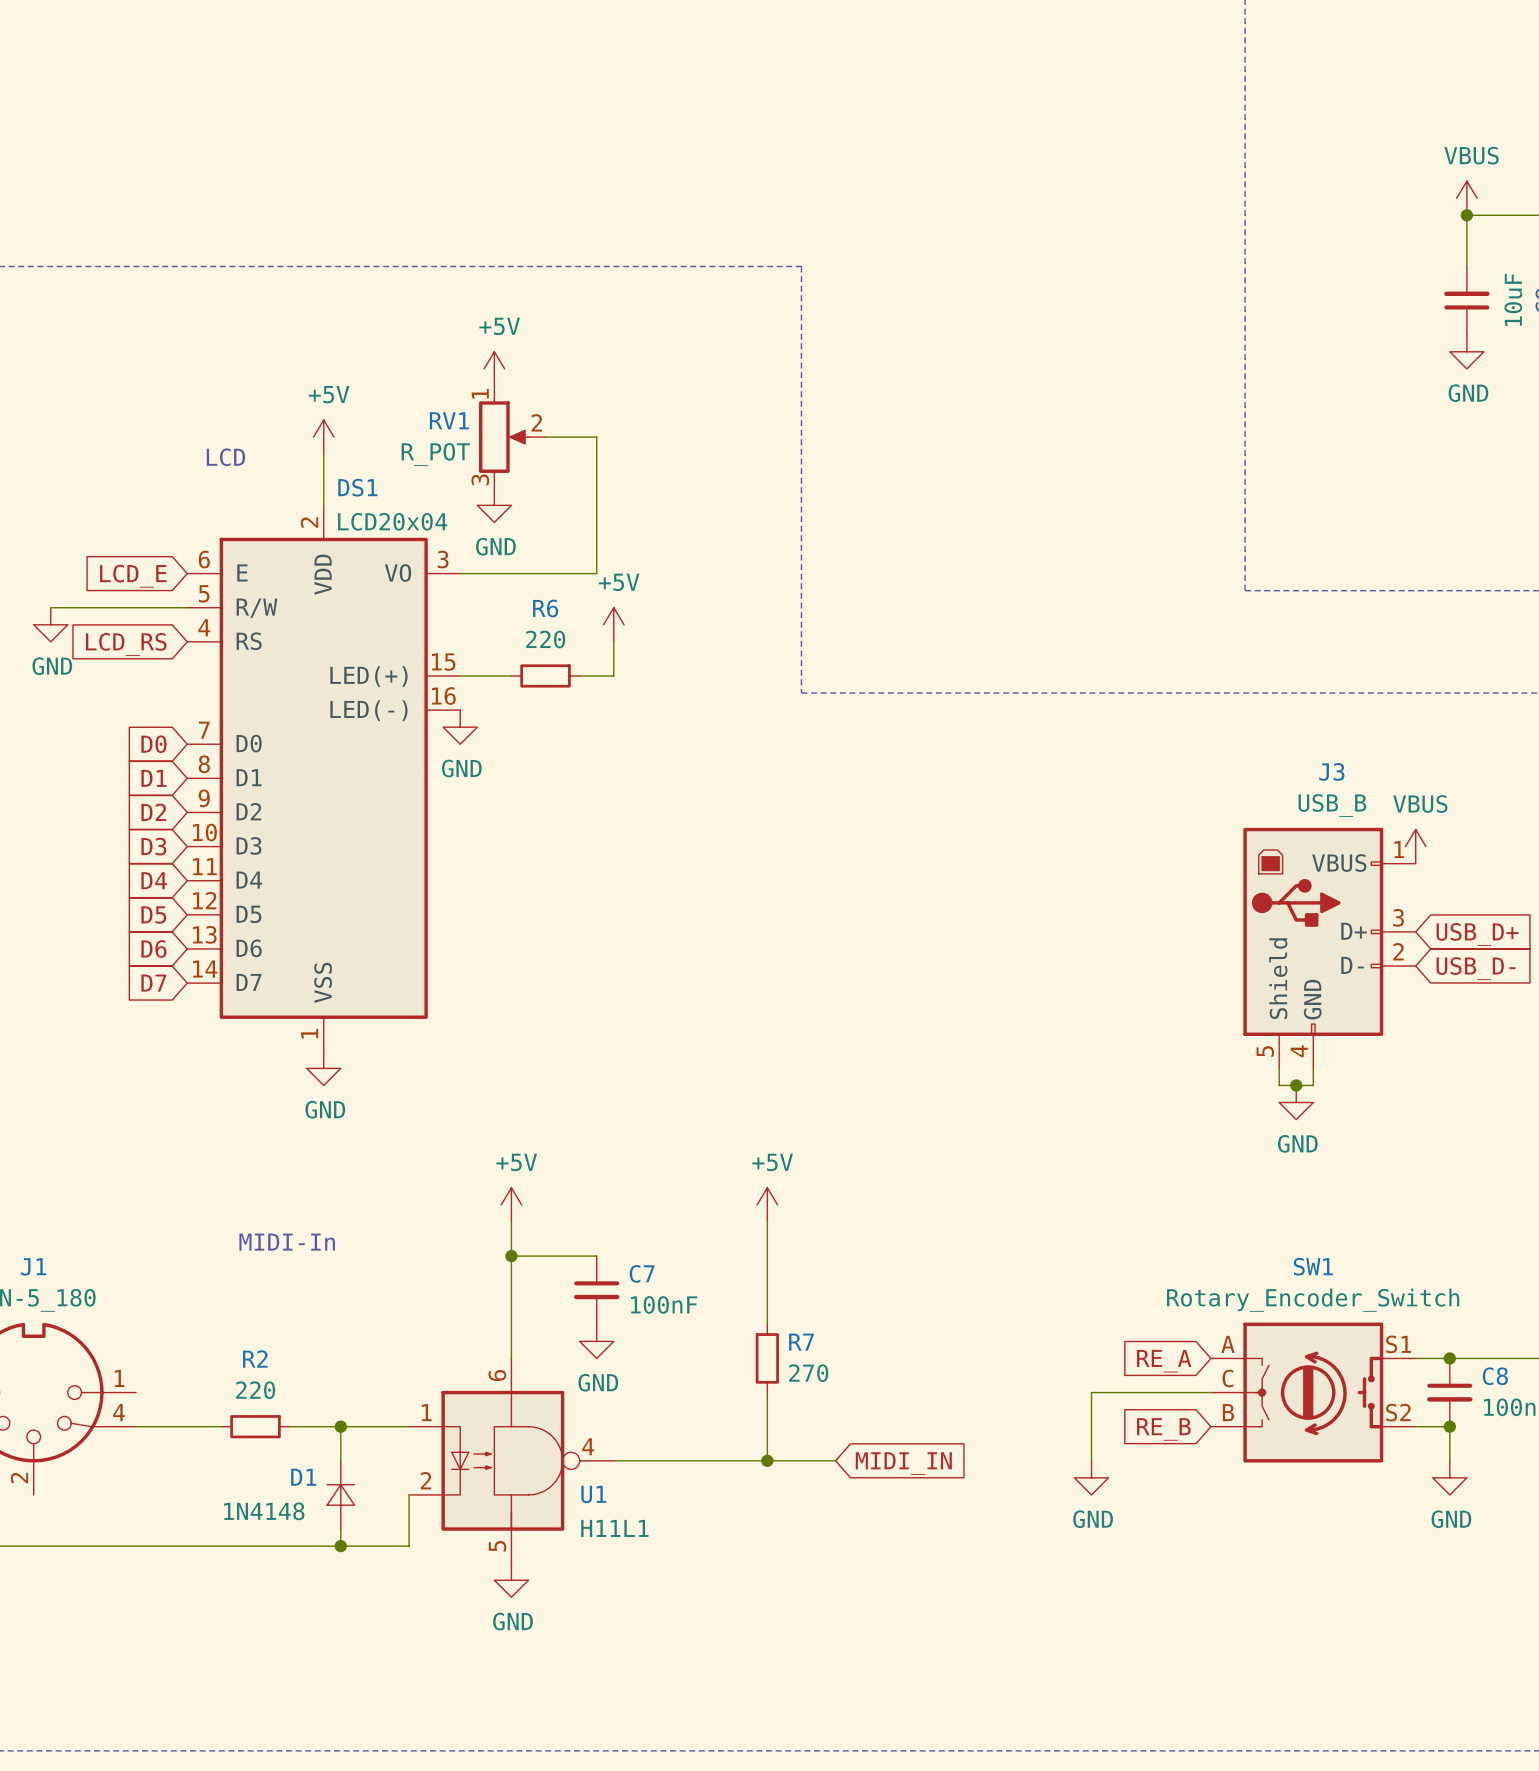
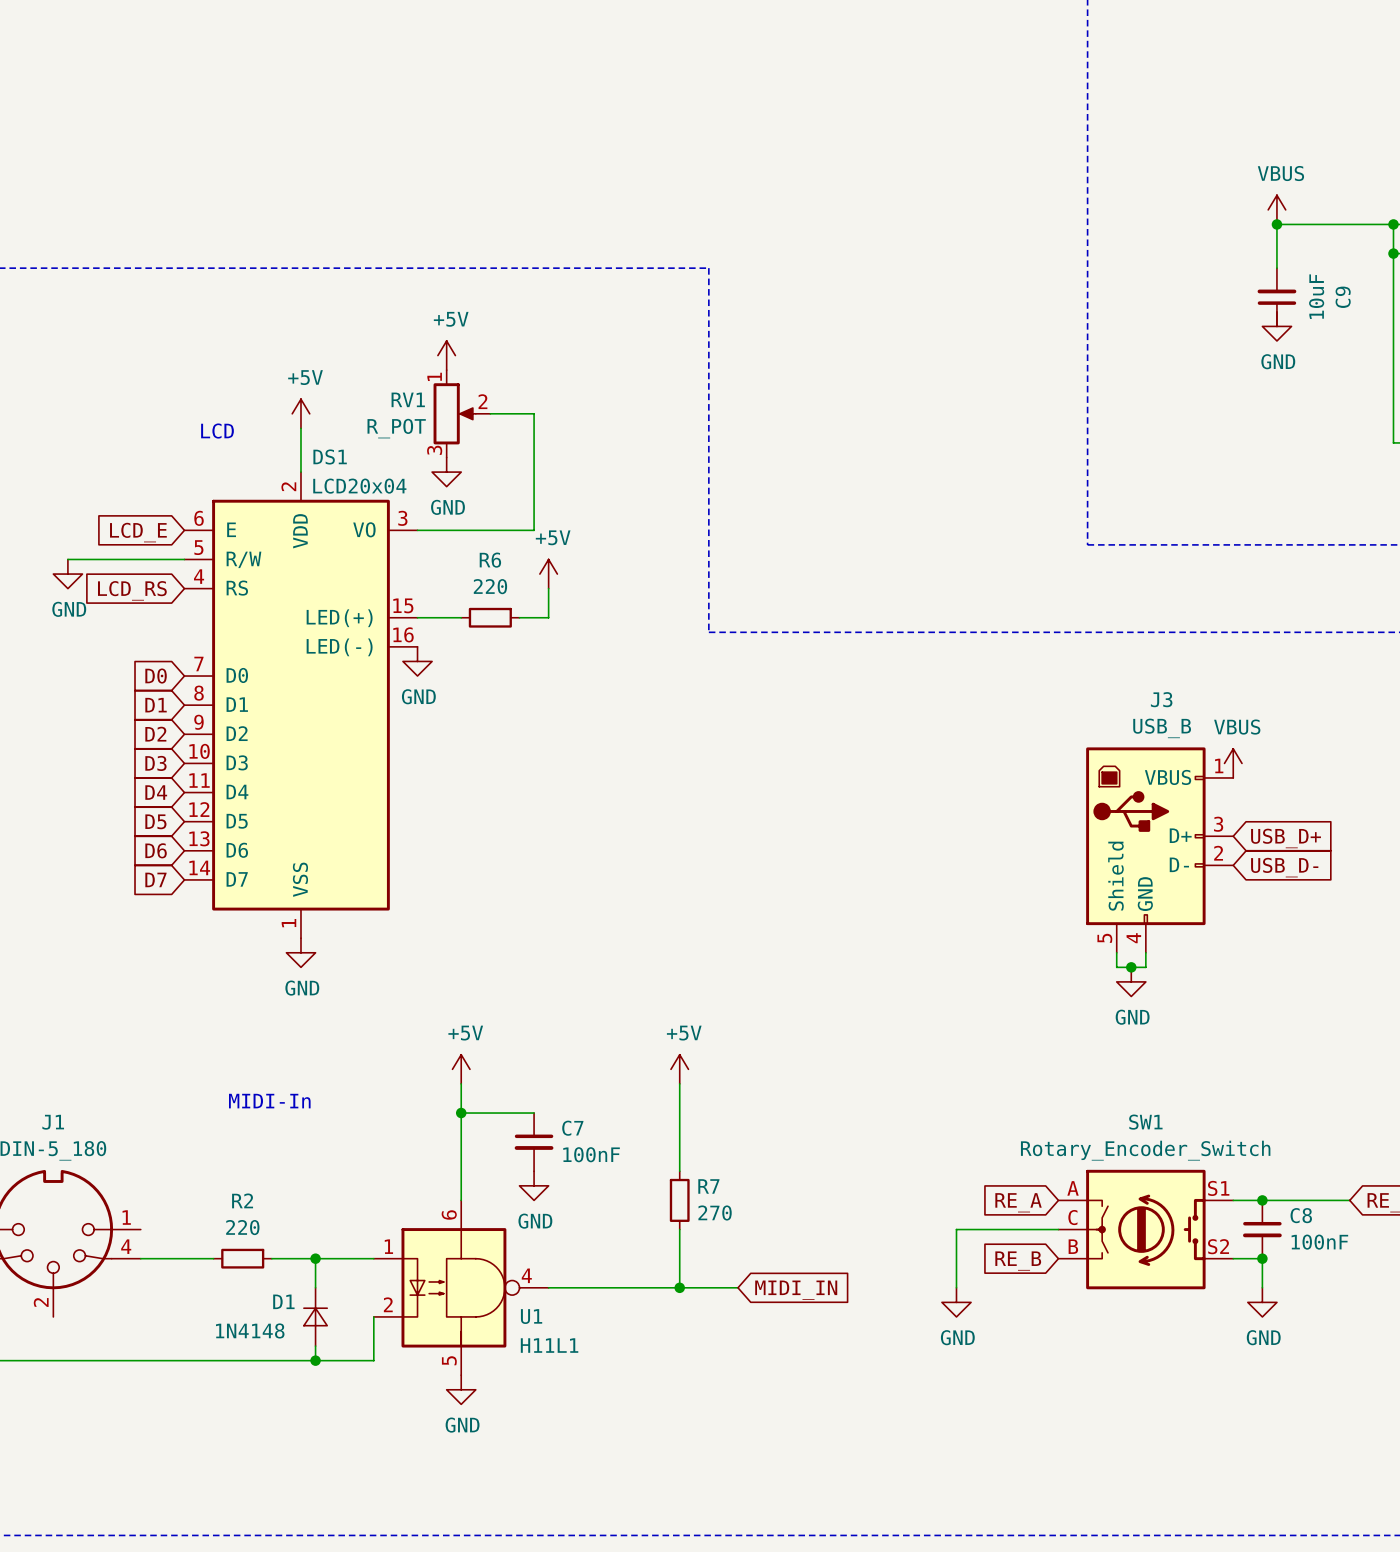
power symbol position: GND (1466, 351) -> GND (1276, 326)

